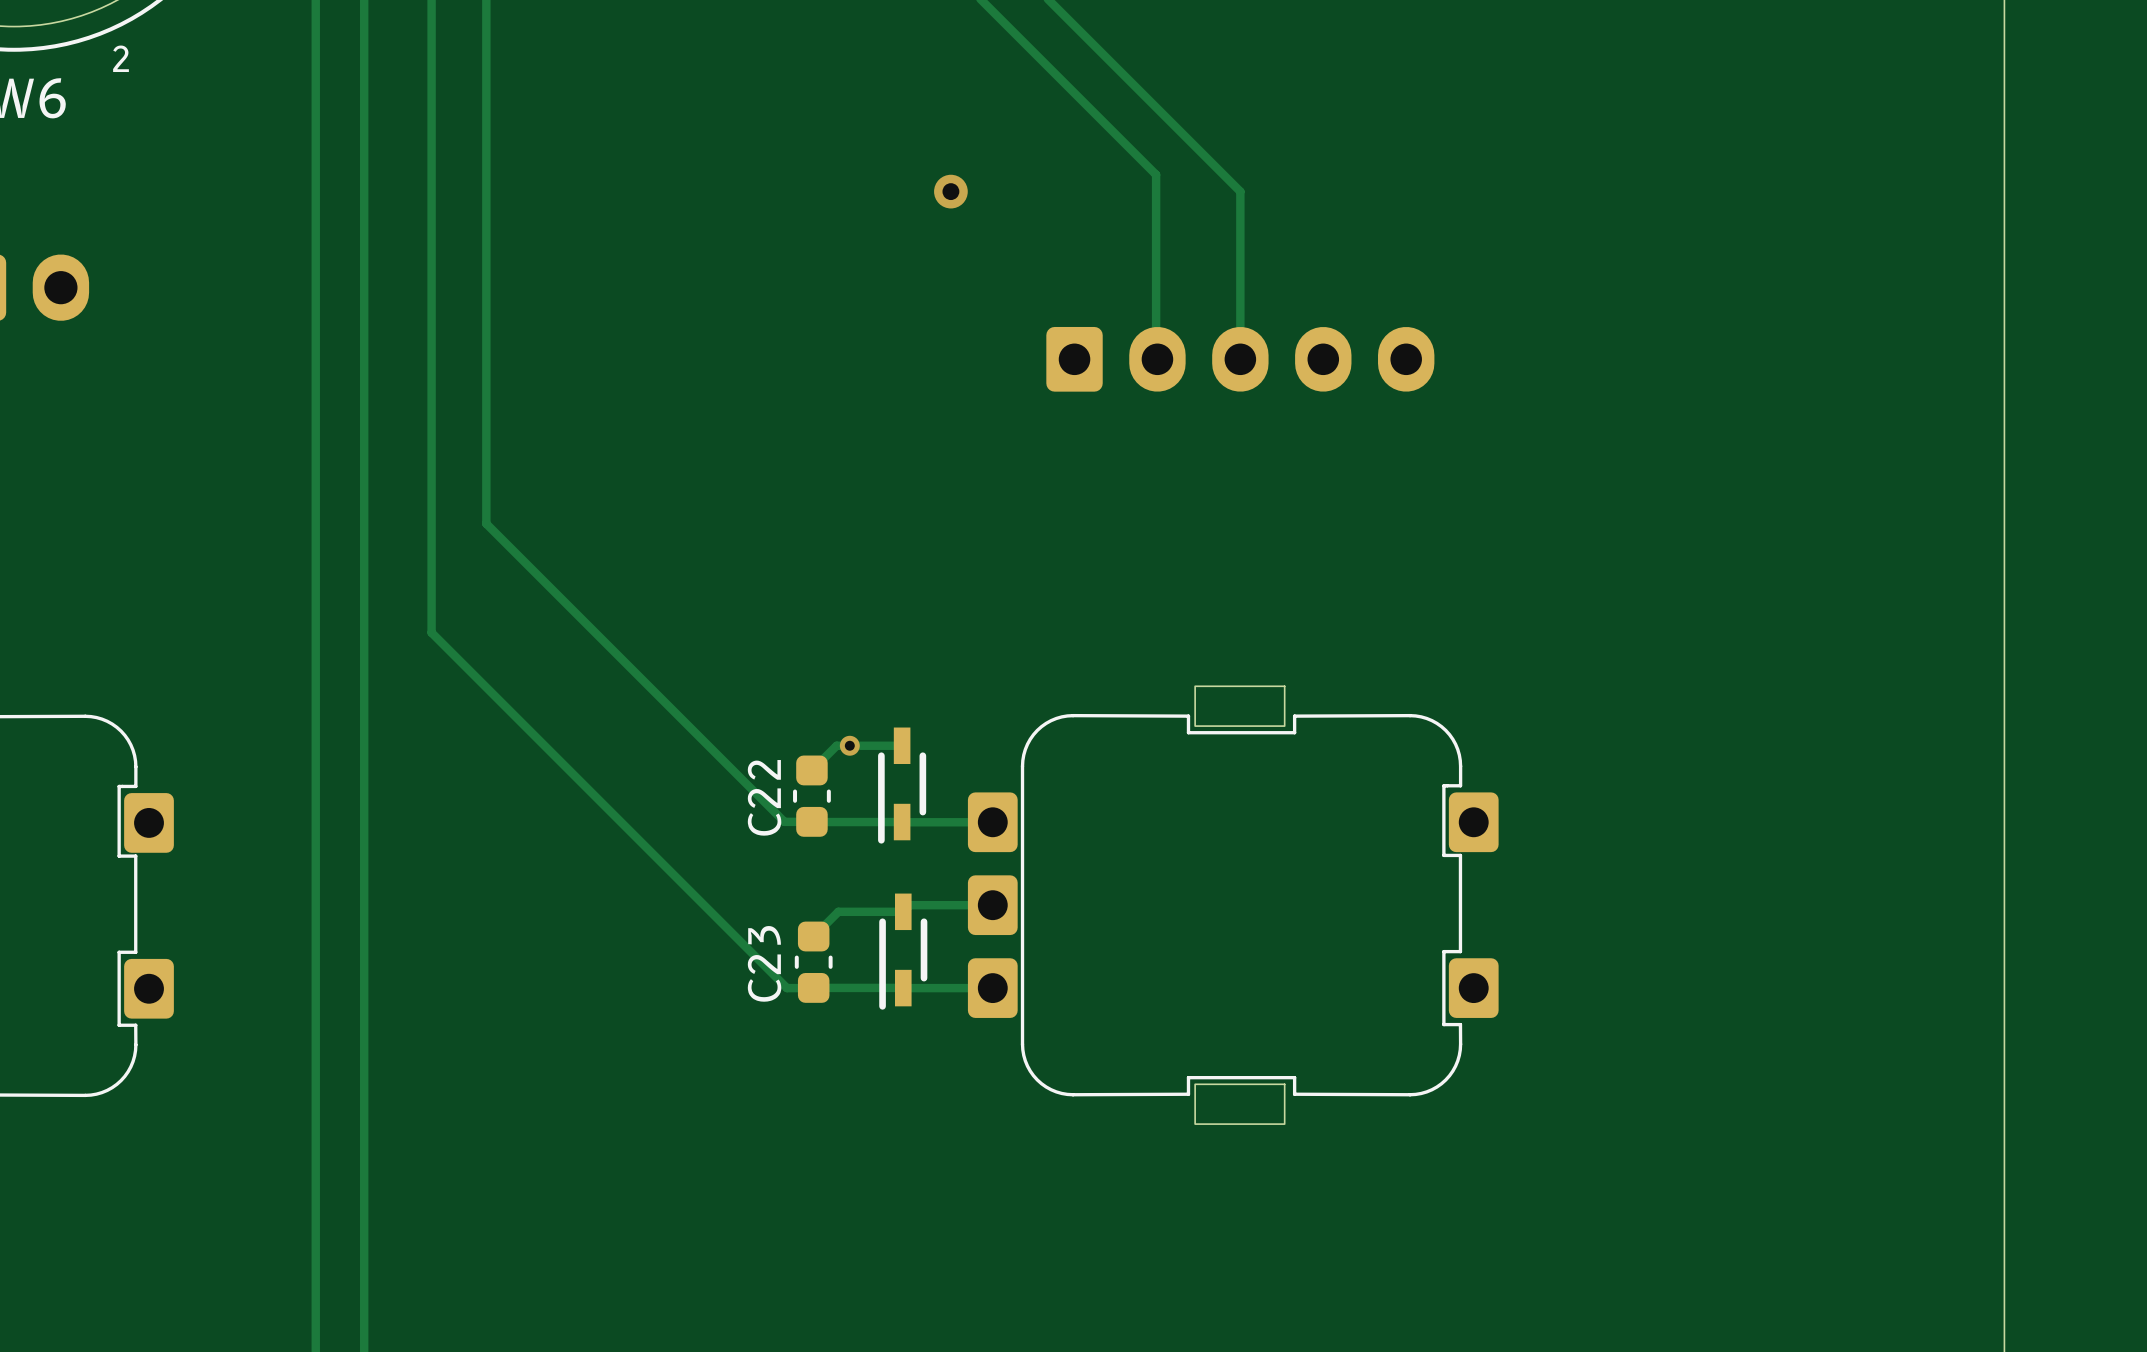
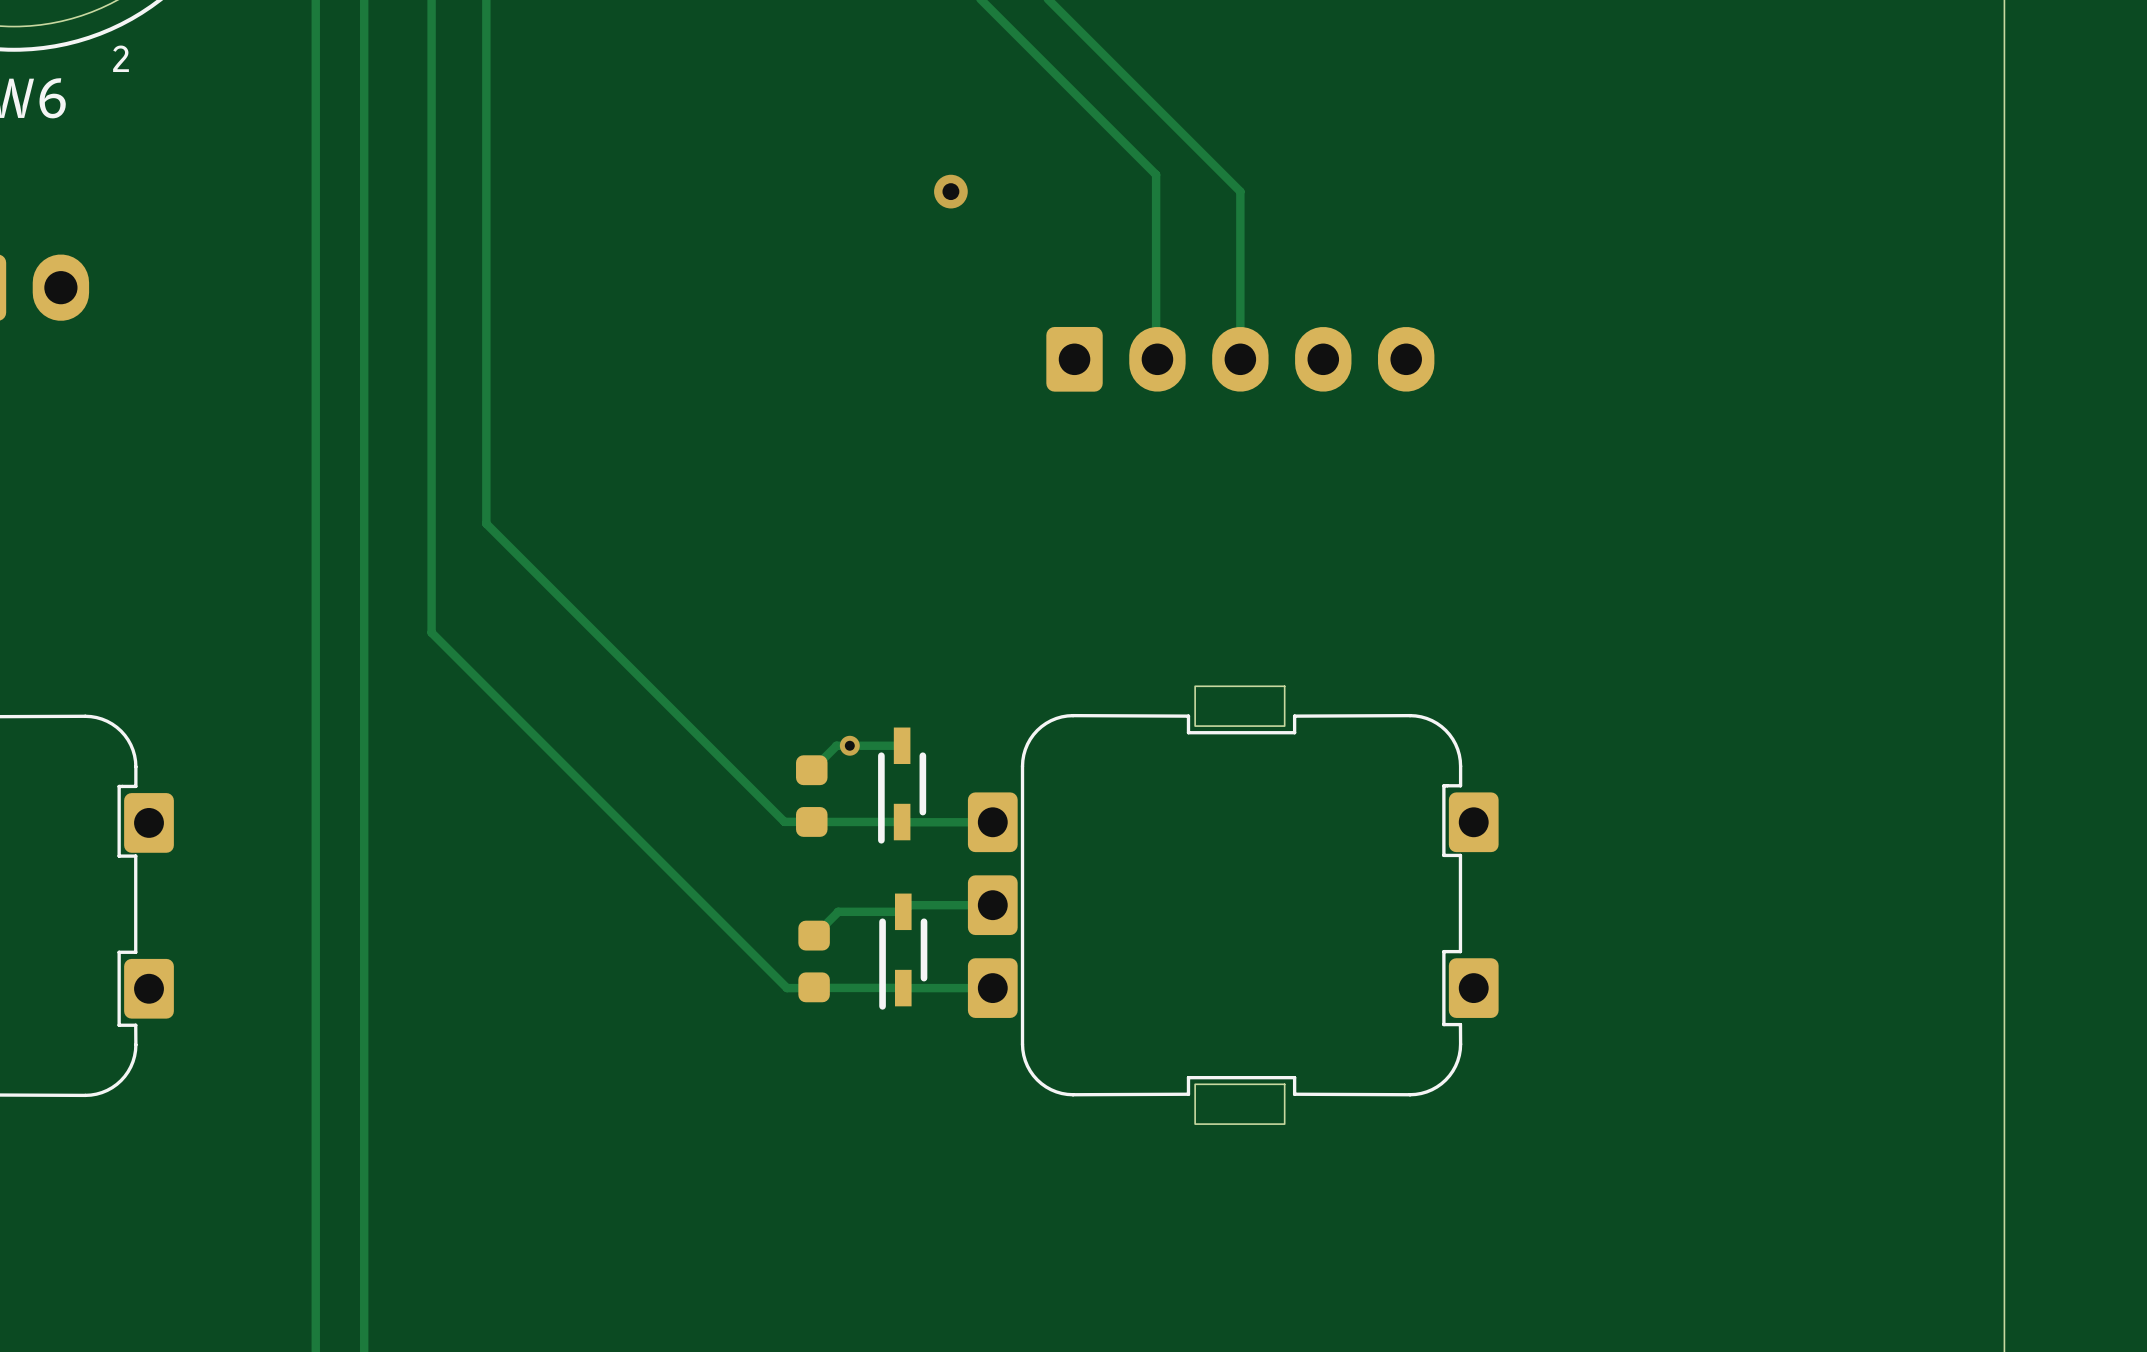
C22: (811, 796) -> none
part: none -> (811, 796)
part: none -> (814, 961)
C23: (813, 962) -> none

